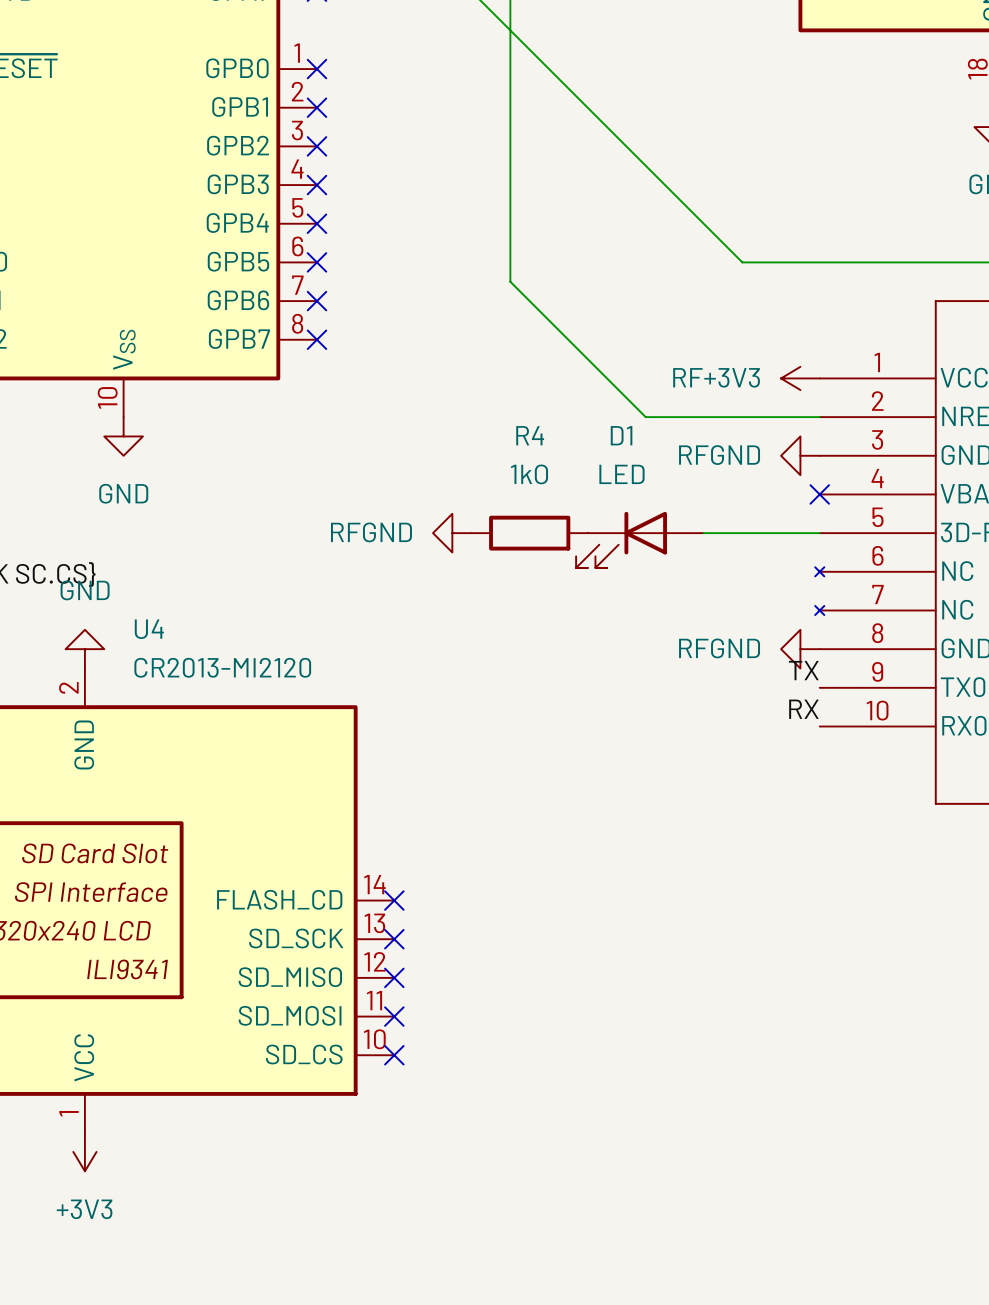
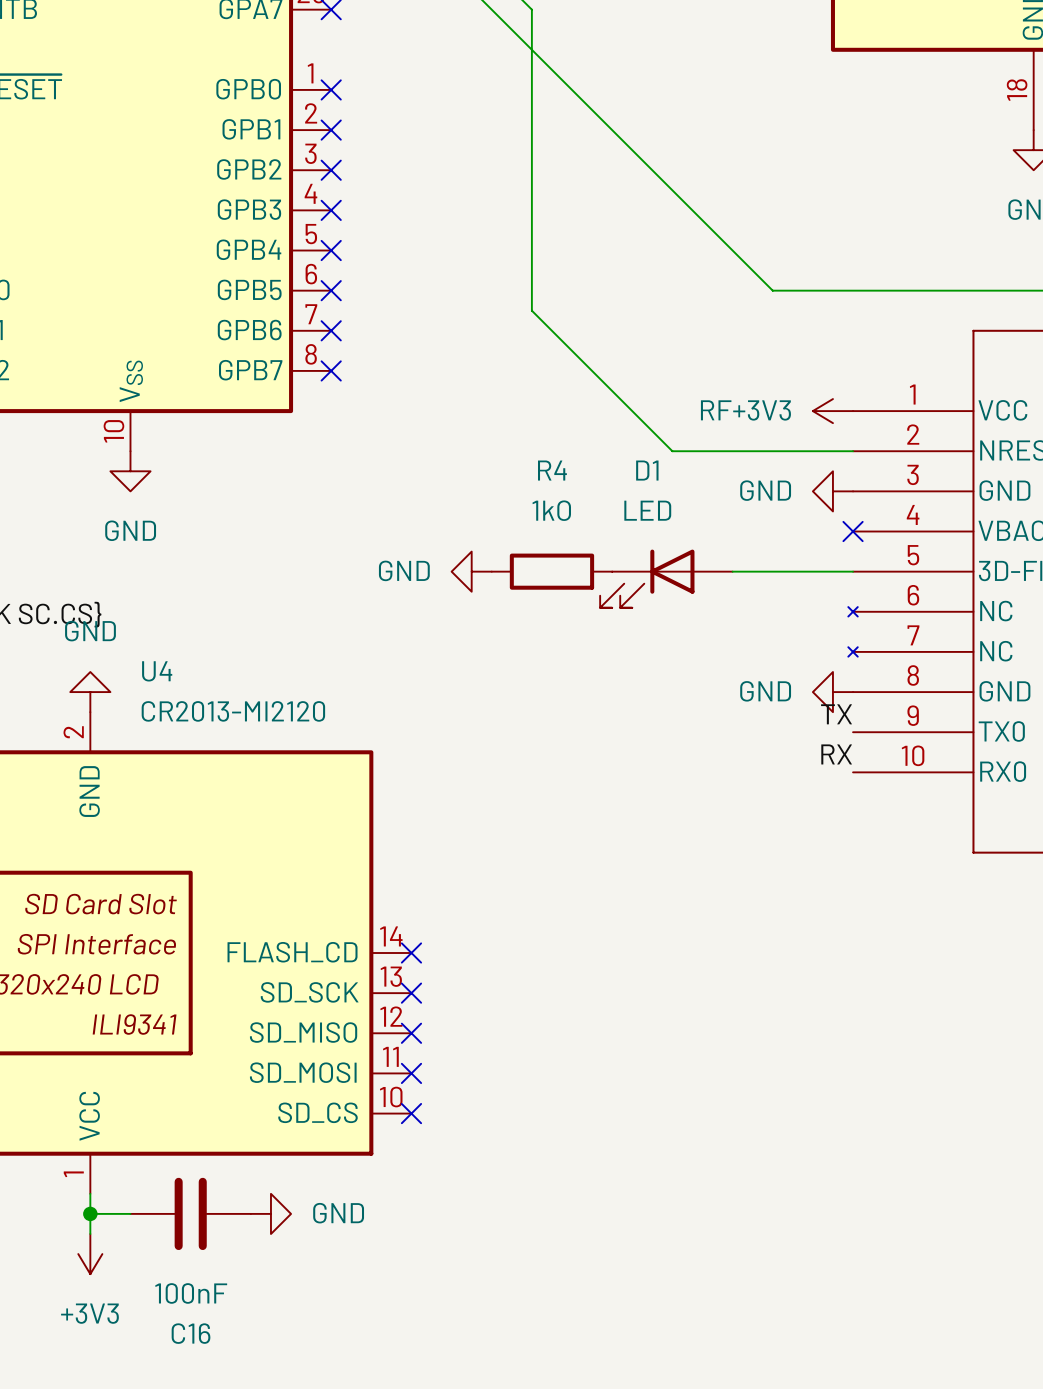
power symbol: RFGND (800, 455) -> GND (832, 491)
power symbol: RFGND (452, 533) -> GND (471, 571)
power symbol: RFGND (800, 649) -> GND (832, 692)
wire: none -> (90, 1213) (130, 1213)
power symbol position: +3V3 (84, 1151) -> +3V3 (90, 1254)
junction: none -> (90, 1213)
C16: none -> 100nF (190, 1213)
power symbol: none -> GND (270, 1213)

